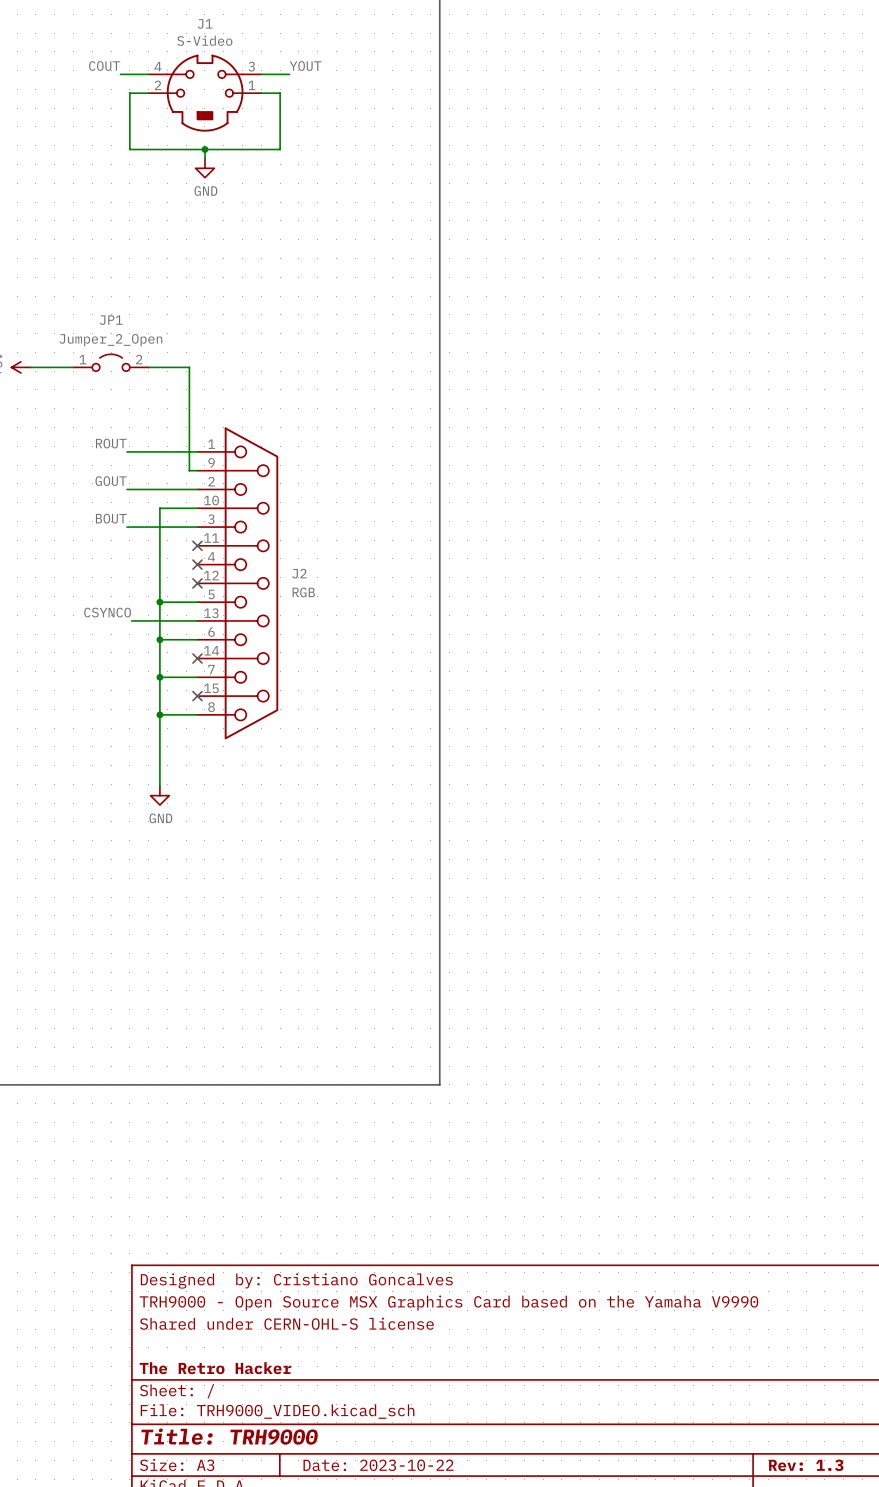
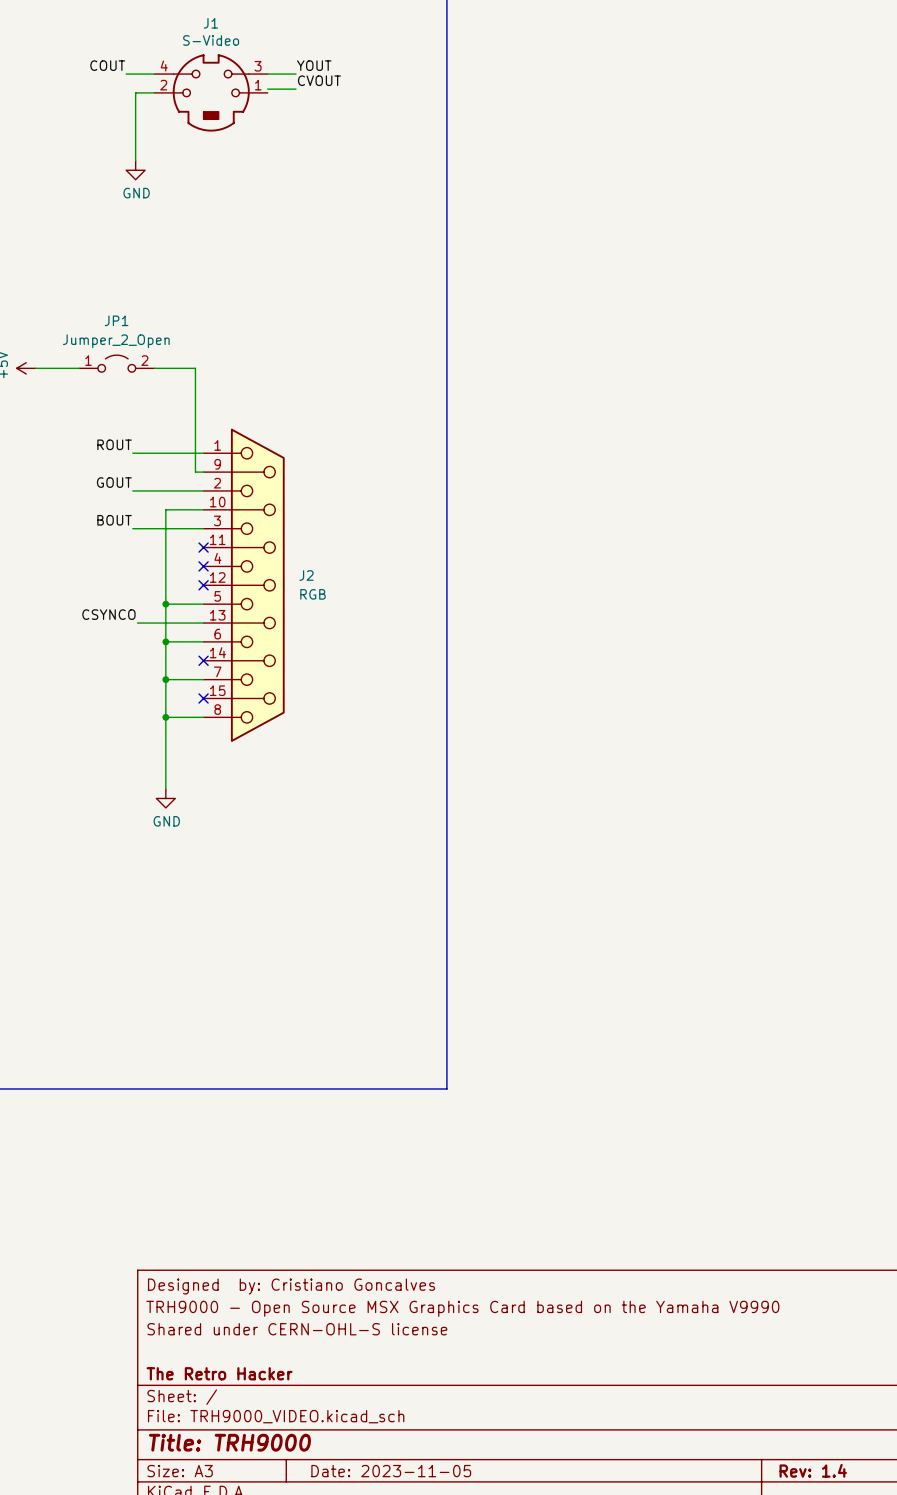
label: none -> CVOUT (319, 80)
wire: none -> (267, 89) (296, 89)
wire: (261, 93) (280, 93) (280, 149) (129, 149) -> (135, 160) (135, 149)
wire: (204, 149) (204, 158) -> none
junction: (204, 149) -> none
power symbol position: GND (204, 168) -> GND (135, 170)
title block: Date: 2023-10-22 (378, 1465) -> Date: 2023-11-05 (391, 1471)
title block: Rev: 1.3 (806, 1465) -> Rev: 1.4 (813, 1470)

